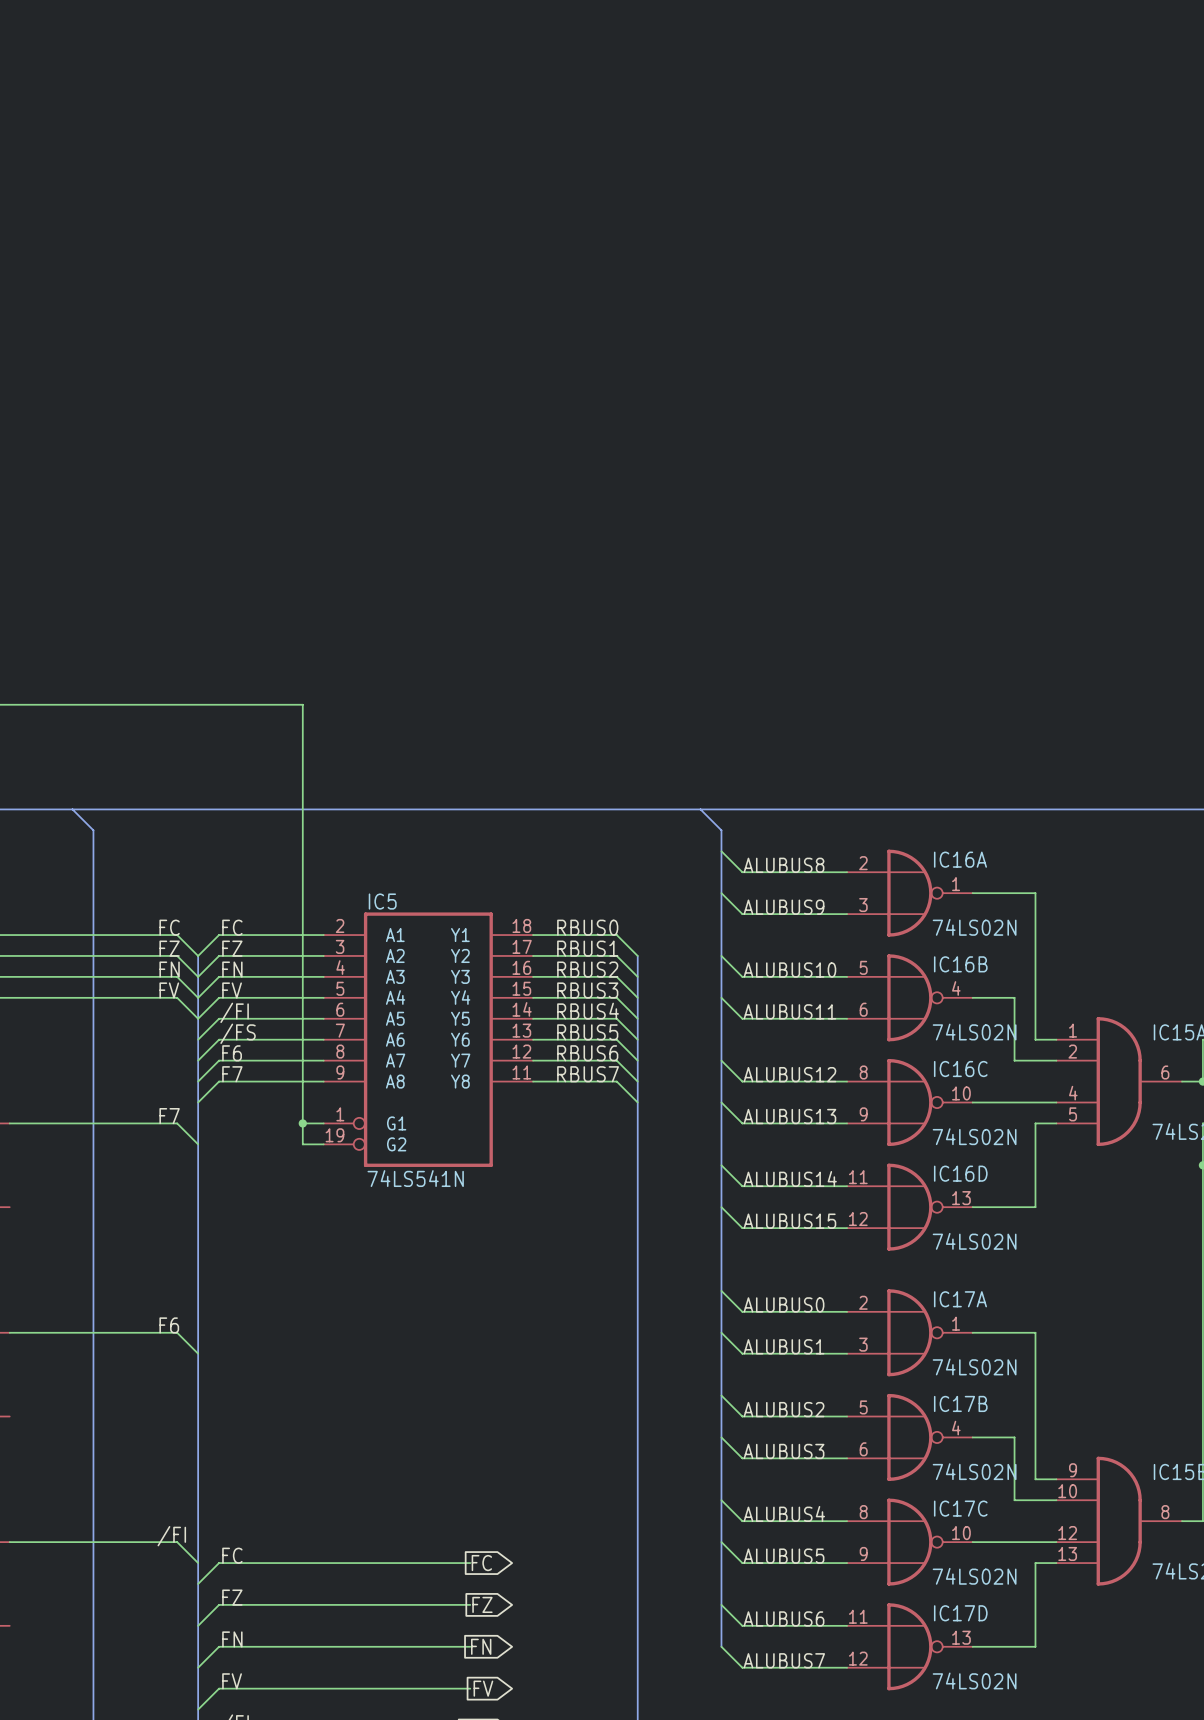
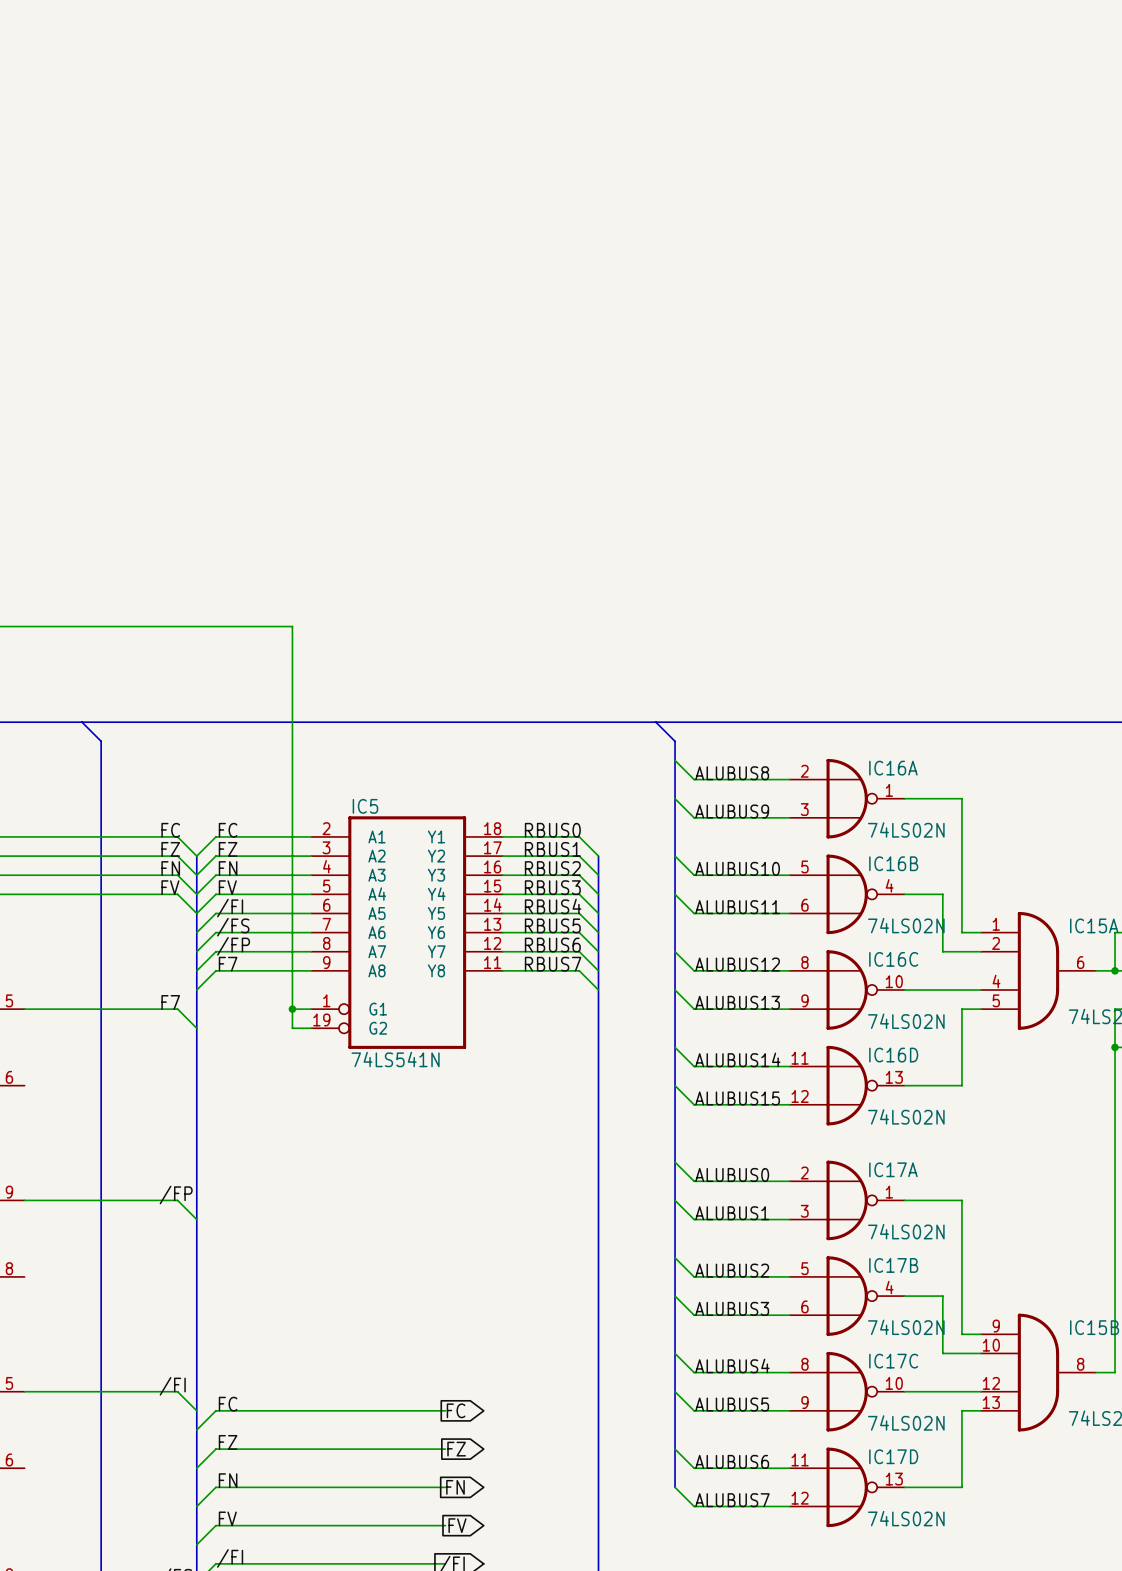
label: F6 (232, 1053) -> /FP (233, 946)
label: F6 (169, 1325) -> /FP (176, 1195)

